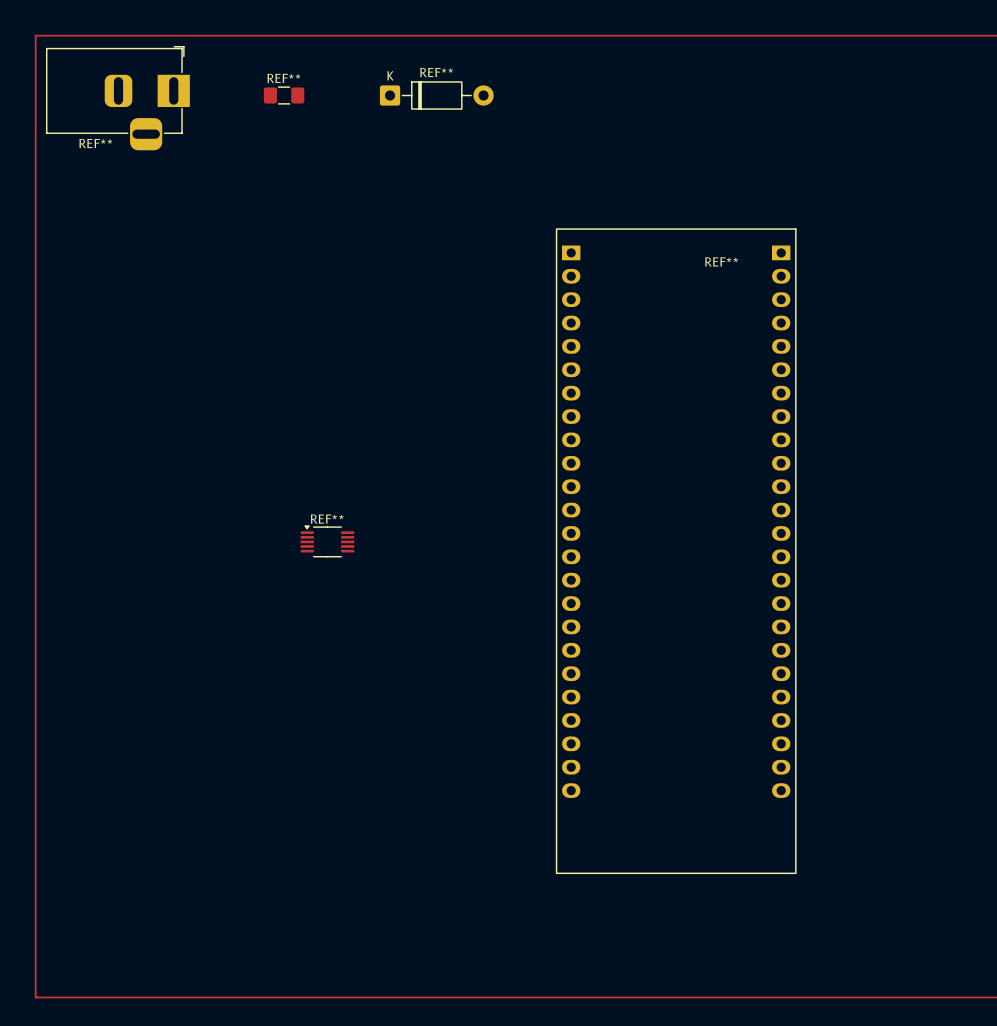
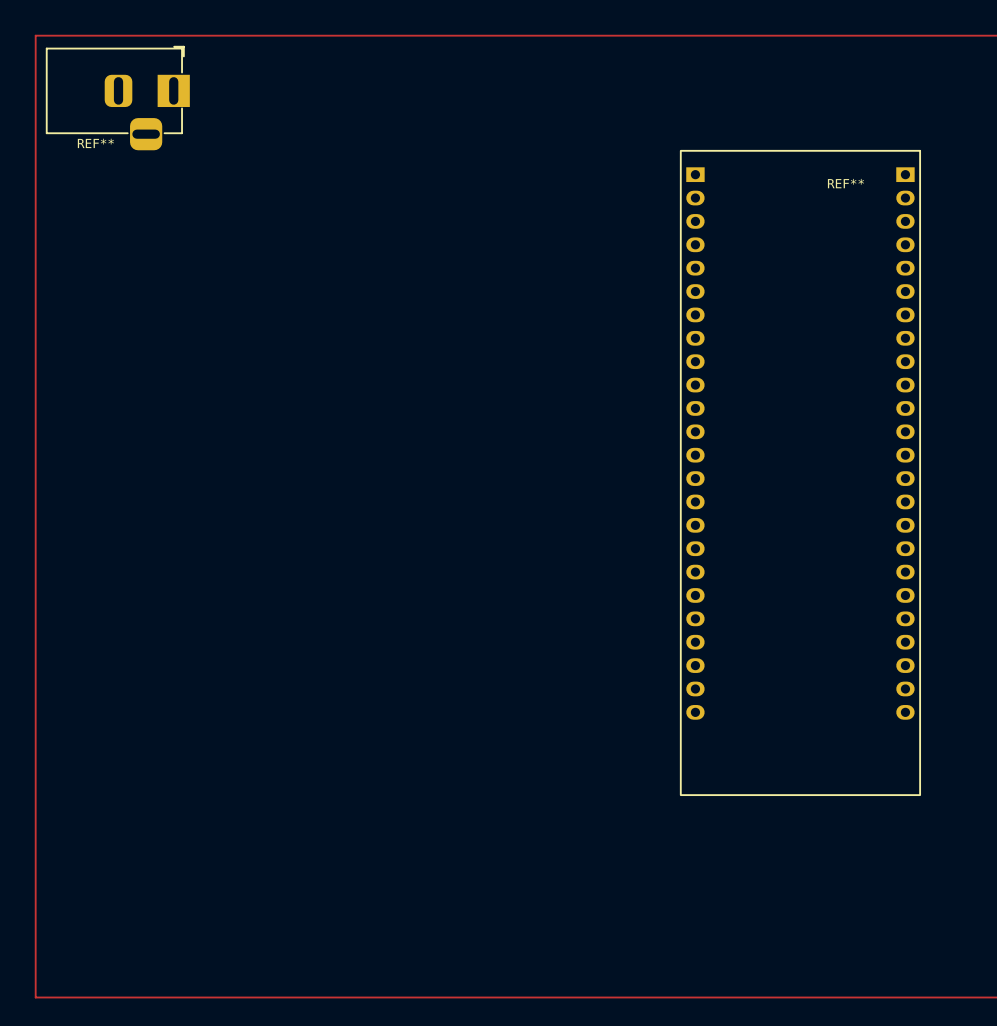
REF**: (284, 95) -> none
REF**: (436, 95) -> none
REF**: (327, 541) -> none
REF** position: (676, 551) -> (800, 472)

